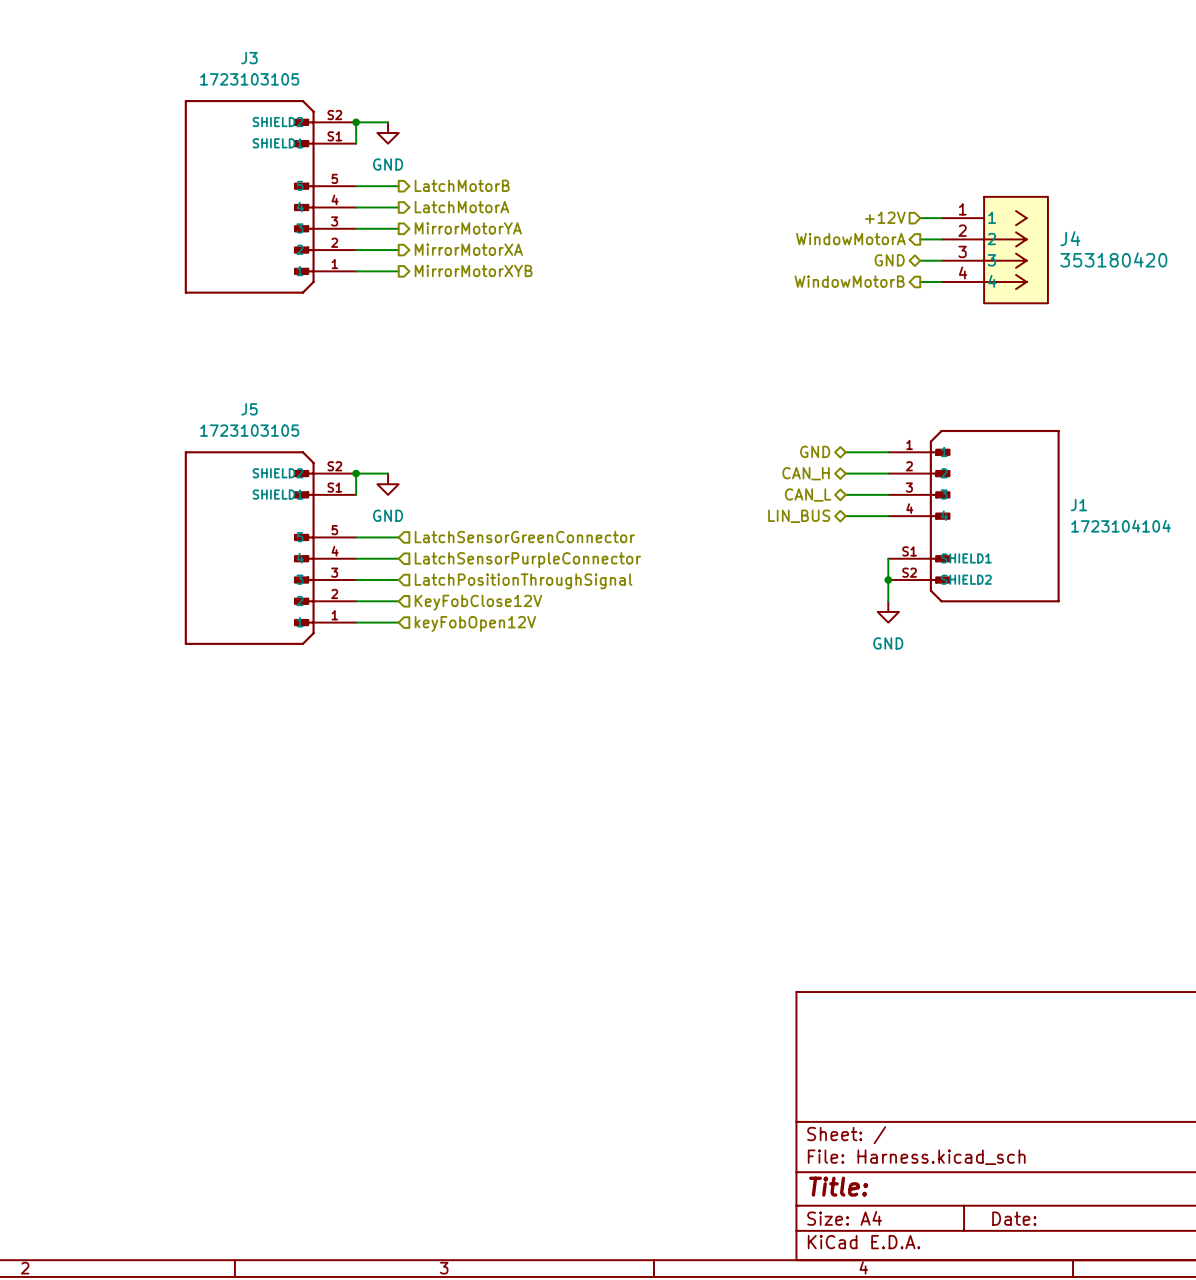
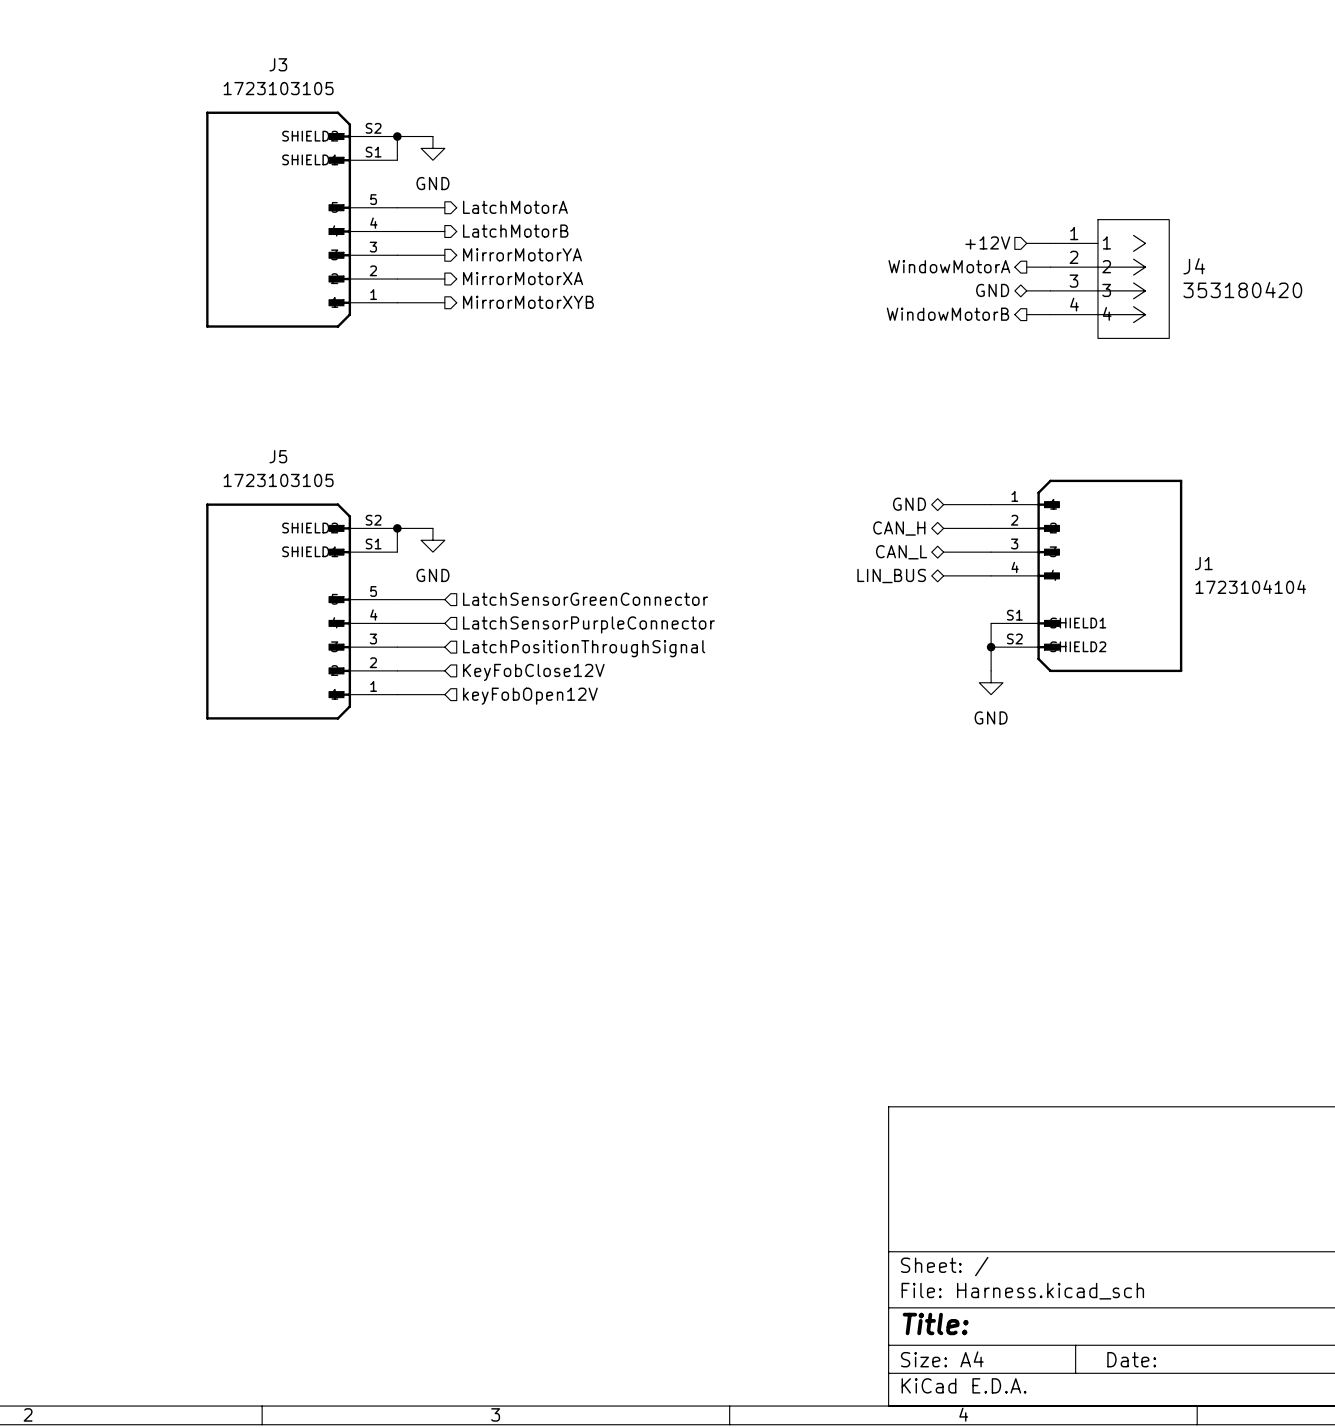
hierarchical label: LatchMotorB (462, 185) -> LatchMotorA (515, 207)
hierarchical label: LatchMotorA (461, 207) -> LatchMotorB (515, 231)

